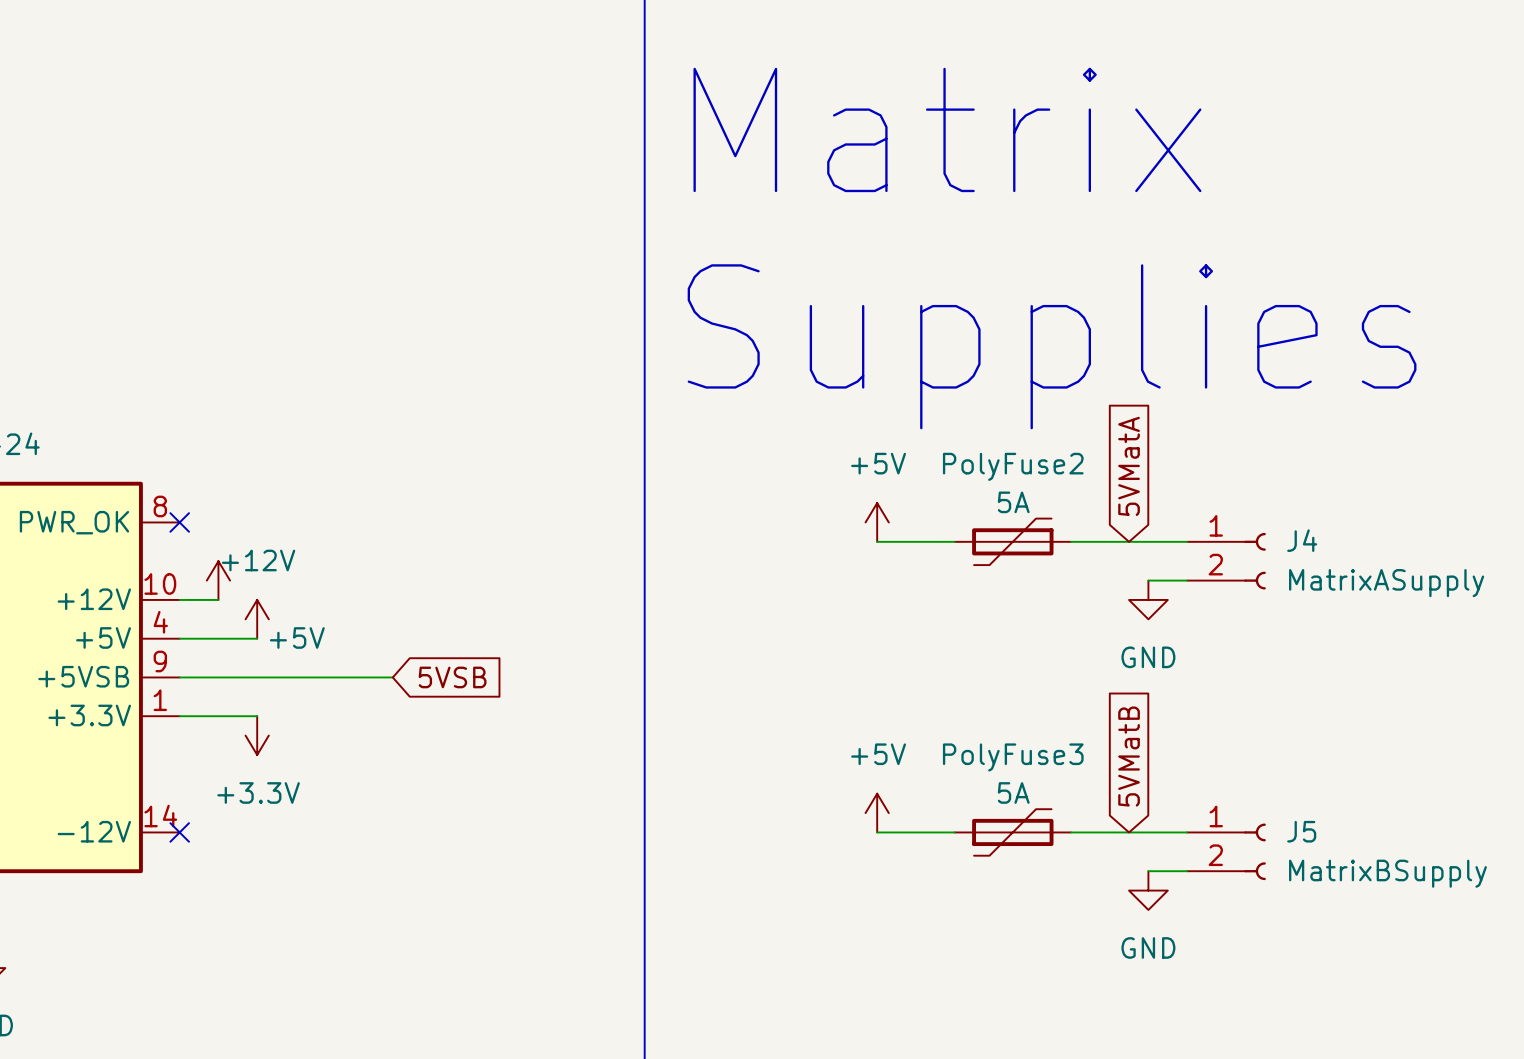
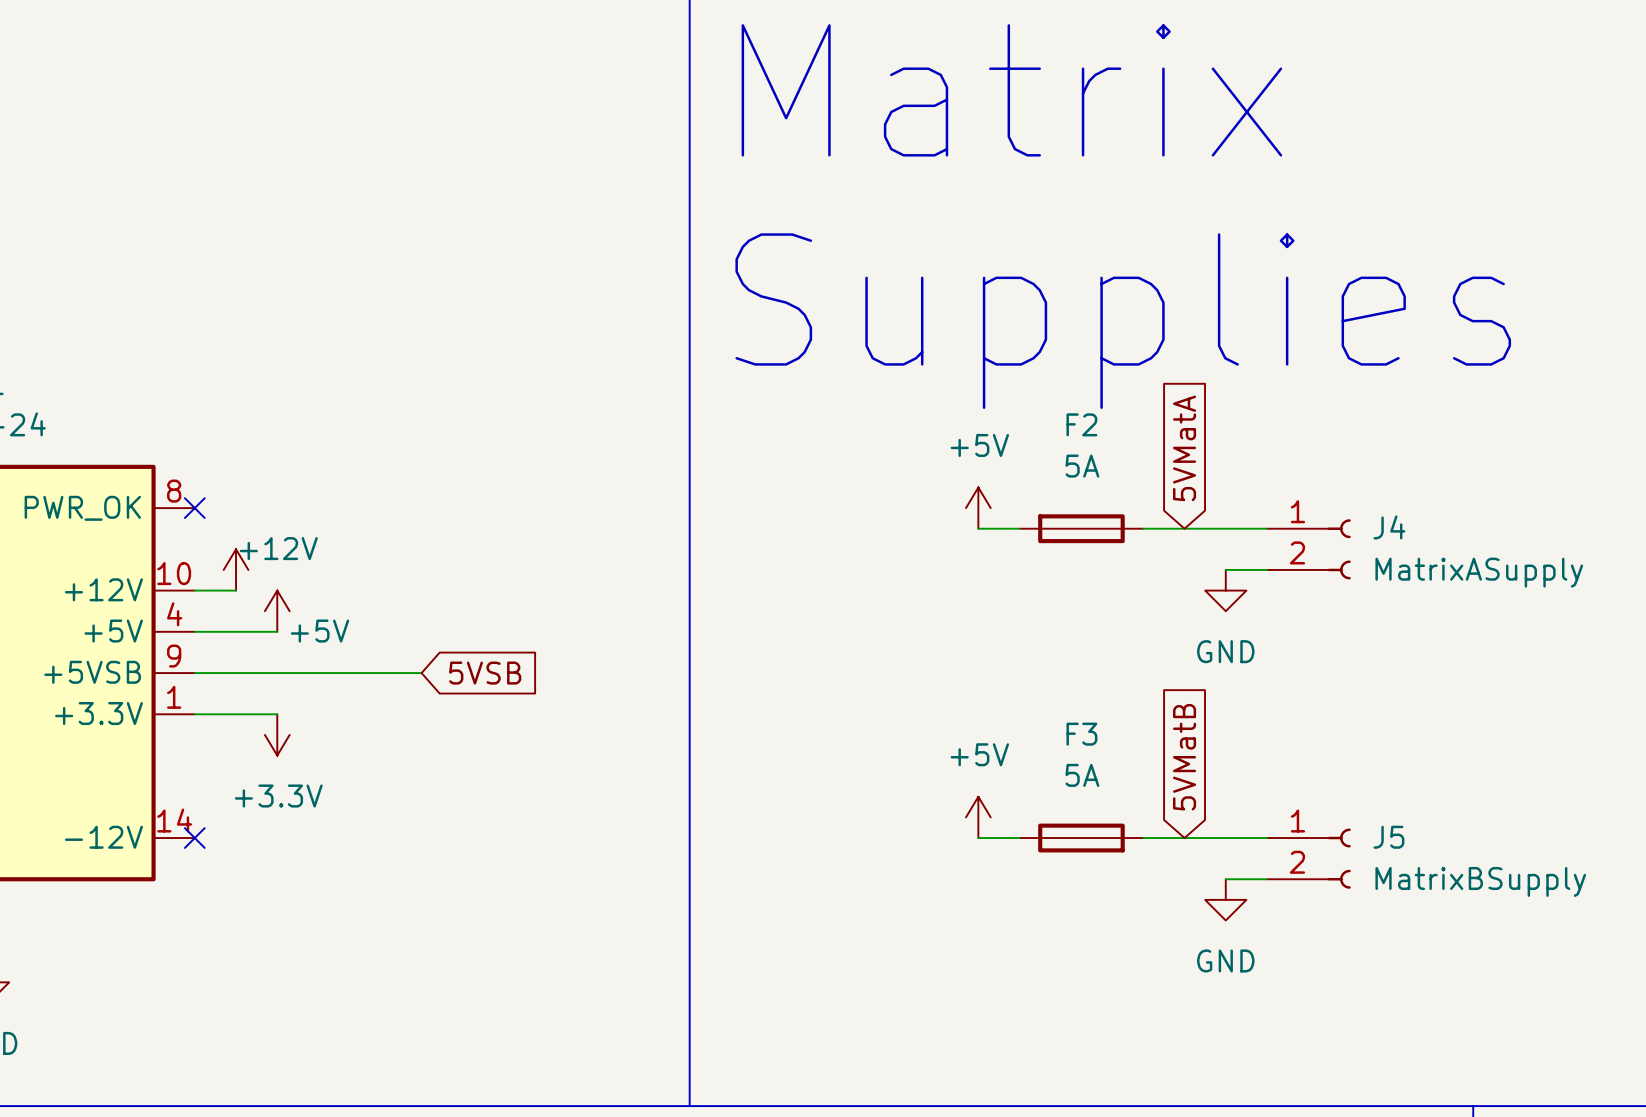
global label position: 5VMatA (1129, 466) -> 5VMatA (1184, 448)
power symbol position: +5V (877, 522) -> +5V (978, 508)
wire: (877, 541) (915, 541) -> none
PolyFuse2: 5A (1012, 541) -> none
F2: none -> 5A (1081, 528)
global label position: 5VMatB (1129, 756) -> 5VMatB (1184, 757)
power symbol position: +5V (877, 813) -> +5V (978, 817)
wire: (877, 832) (915, 832) -> none
PolyFuse3: 5A (1012, 832) -> none
F3: none -> 5A (1081, 838)

